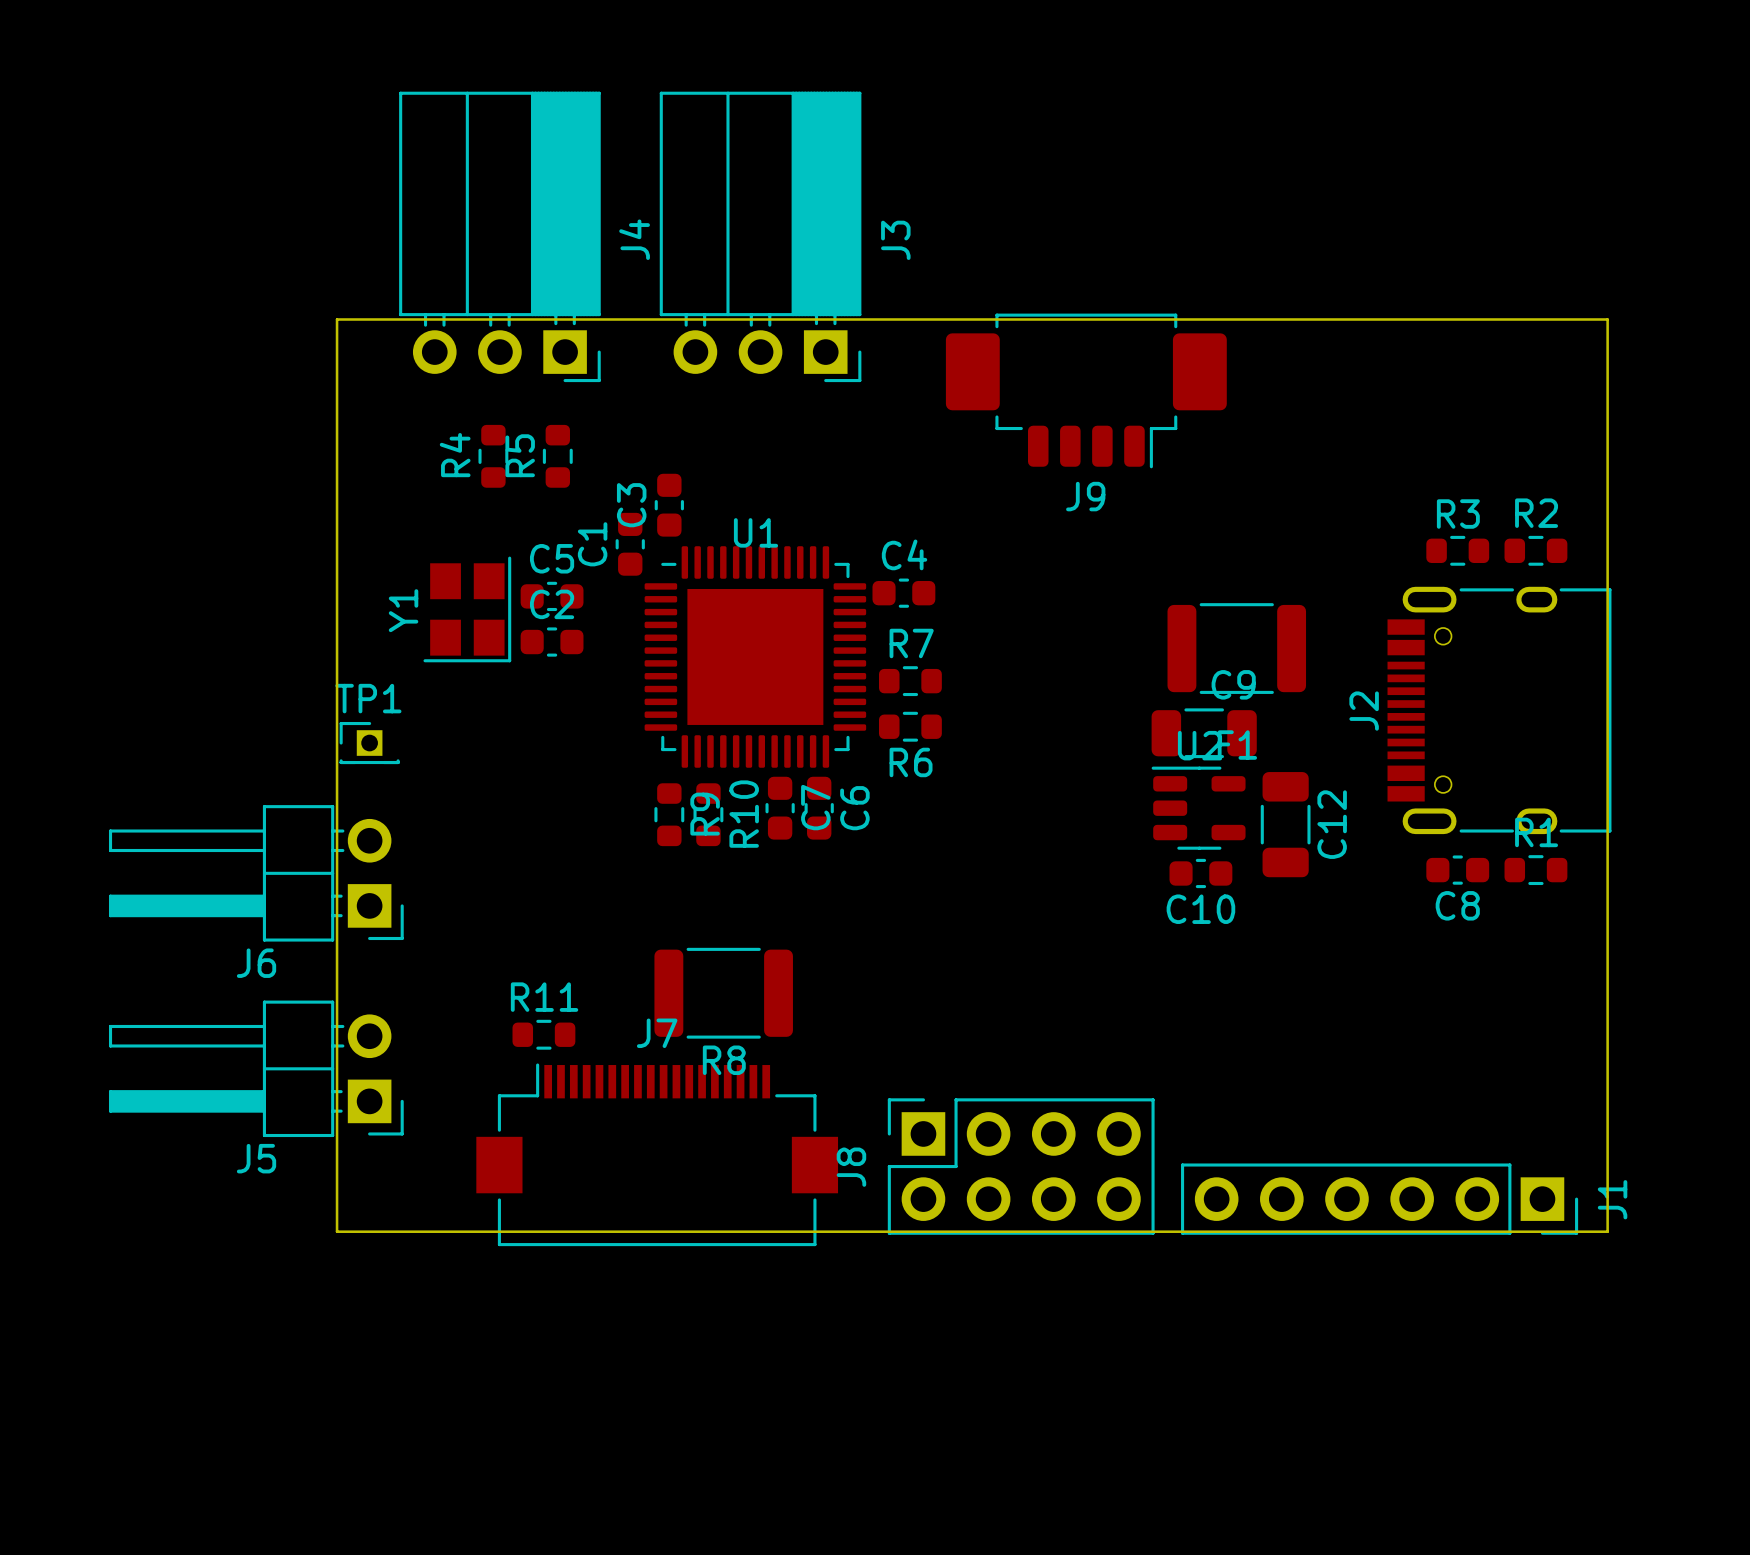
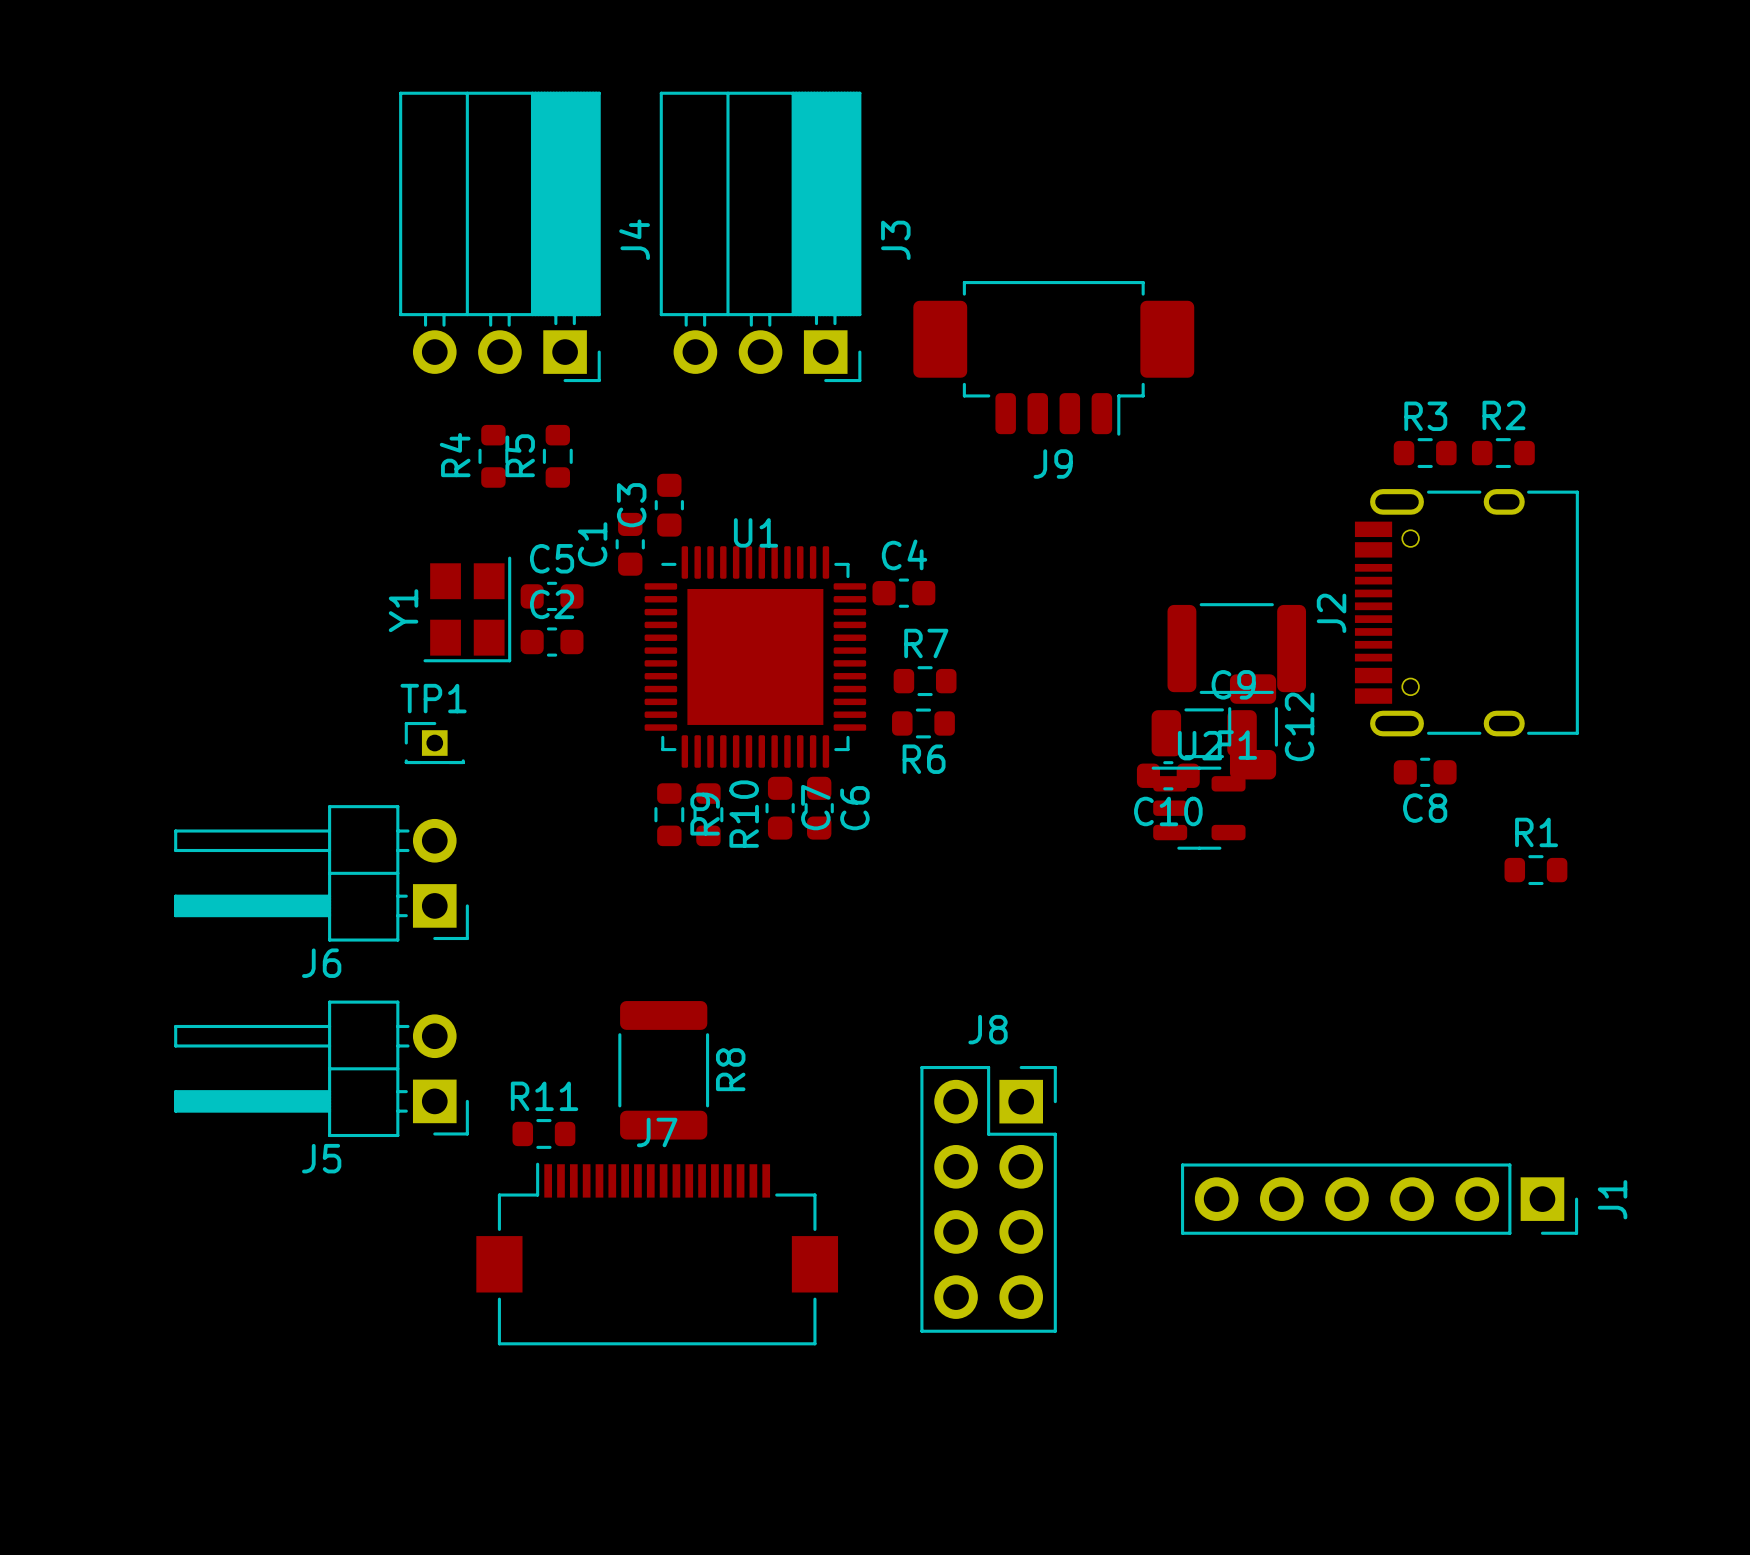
board edge: (337, 319) (1607, 319) (1607, 1231) (337, 1231) (337, 319) -> none
J9 position: (1086, 390) -> (1053, 358)
R3 position: (1457, 550) -> (1425, 453)
R2 position: (1535, 550) -> (1503, 453)
R7 position: (910, 681) -> (925, 681)
J2 position: (1499, 710) -> (1466, 612)
R6 position: (910, 726) -> (923, 723)
TP1 position: (369, 743) -> (434, 743)
C12 position: (1285, 824) -> (1253, 726)
C8 position: (1457, 870) -> (1425, 772)
J6 position: (256, 873) -> (321, 873)
C10 position: (1200, 873) -> (1168, 775)
R8 rotation: 0° (723, 993) -> 90° clockwise (663, 1070)
R8 position: (723, 993) -> (663, 1070)
R11 position: (543, 1034) -> (543, 1133)
R8 name position: R8 (724, 1060) -> R8 (730, 1069)
J5 position: (256, 1068) -> (321, 1068)
J7 position: (657, 1154) -> (657, 1254)
J8 rotation: 0° (1021, 1166) -> 90° clockwise (988, 1199)

